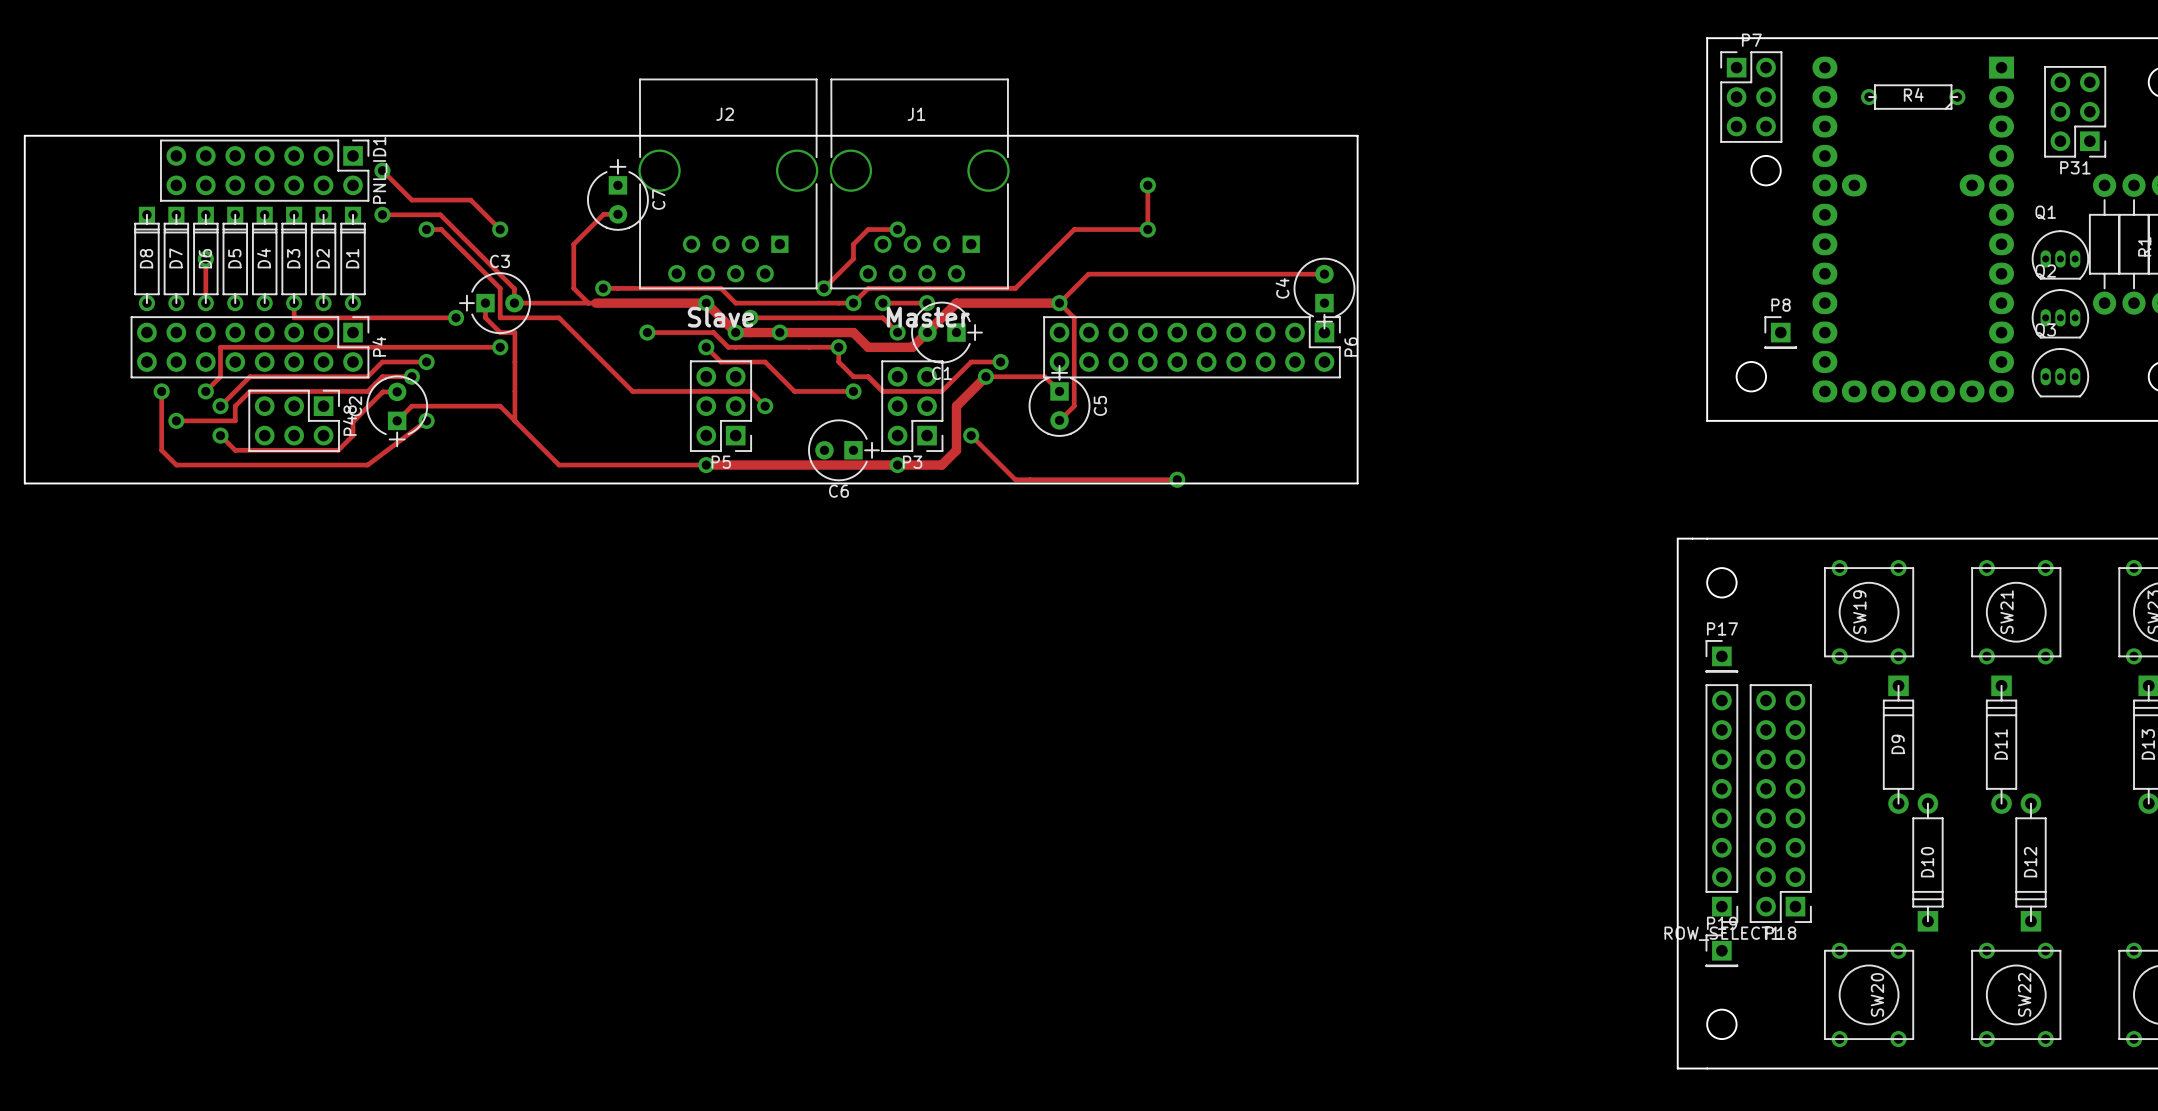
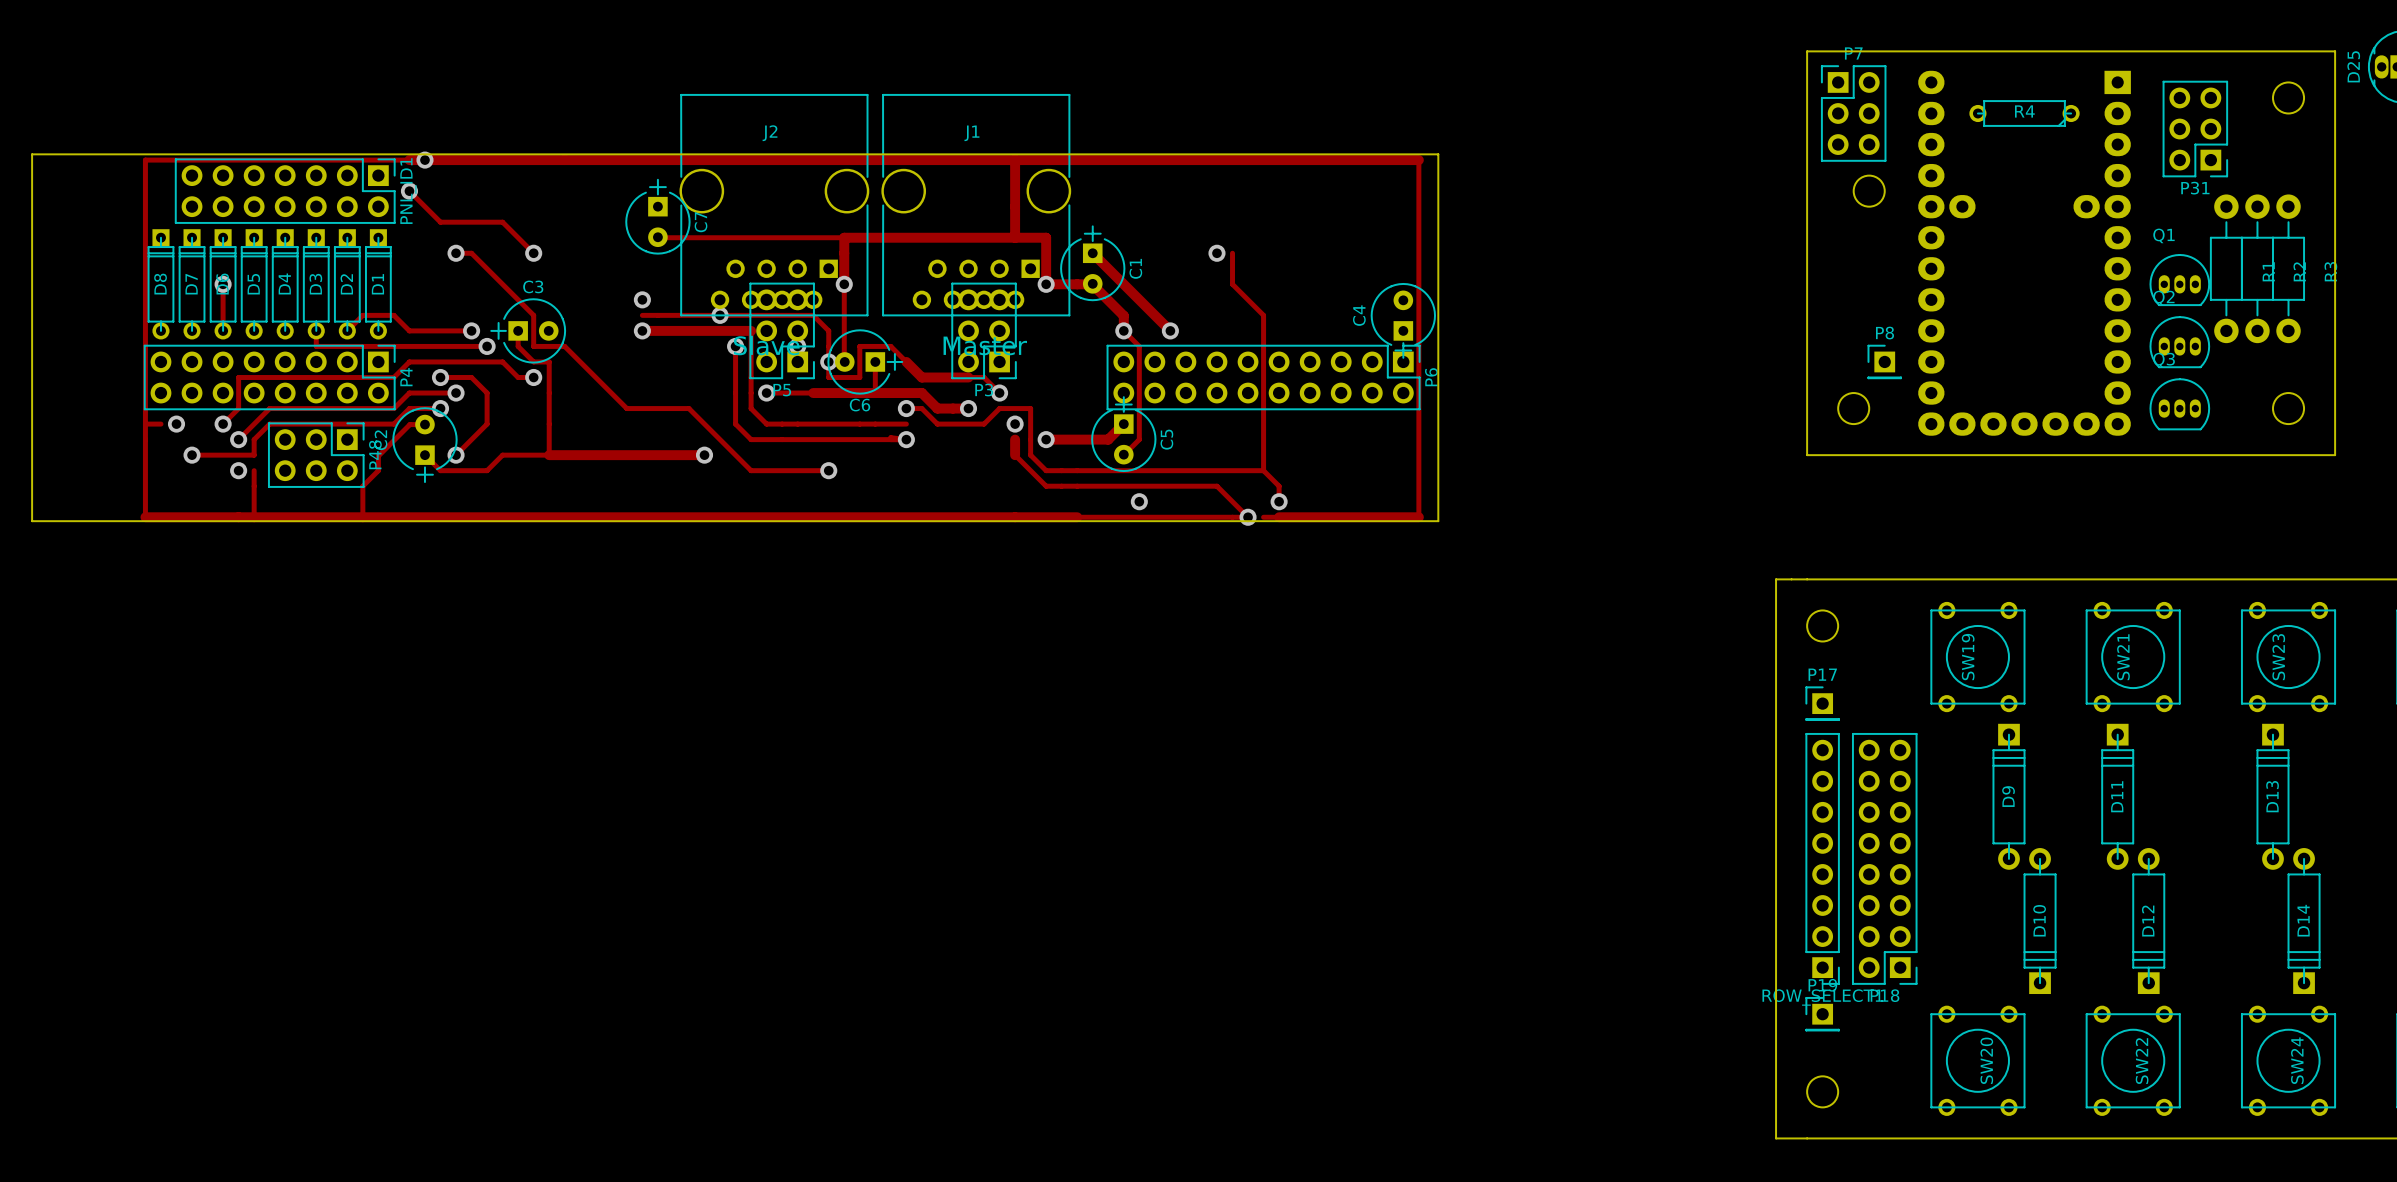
via: none -> (424, 160)
track: none -> (1015, 160) (1015, 237)
track: (1147, 185) (1147, 229) (1074, 229) (1015, 288) (868, 288) (853, 303) (735, 303) (720, 288) -> none
via: (1147, 185) -> none
track: (382, 214) (440, 214) (514, 288) (514, 303) (603, 303) -> none
via: (382, 214) -> none
track: (617, 214) (603, 214) (573, 244) (573, 288) (588, 303) -> (657, 237) (844, 237)
track: none -> (844, 237) (1046, 237) (1046, 284) (1092, 284) (1123, 315) (1123, 330)
track: none -> (844, 237) (844, 361)
track: (897, 229) (868, 229) (853, 244) (853, 258) (824, 288) -> none
via: (897, 229) -> none
track: none -> (1092, 253) (1170, 330)
track: none -> (1232, 253) (1232, 284) (1263, 315) (1263, 470)
via: none -> (844, 284)
via: none -> (1046, 284)
via: none -> (642, 299)
track: (1324, 274) (1088, 274) (1059, 303) (956, 303) (912, 347) -> (999, 393) (984, 377) (968, 377)
via: (603, 288) -> none
via: none -> (720, 315)
via: (824, 288) -> none
track: none -> (347, 330) (362, 315) (393, 315) (409, 330) (471, 330)
via: none -> (471, 330)
via: none -> (642, 330)
track: (706, 303) (735, 332) (853, 332) -> (751, 330) (751, 408) (766, 424)
via: (706, 303) -> none
via: (853, 303) -> none
track: (882, 303) (927, 303) -> none
via: (882, 303) -> none
via: (927, 303) -> none
via: none -> (1170, 330)
track: (529, 317) (559, 317) (632, 391) (720, 391) -> (564, 346) (626, 408) (688, 408) (751, 470) (828, 470)
track: none -> (735, 346) (735, 424) (751, 439) (906, 439) (890, 437) (890, 439)
via: none -> (735, 346)
track: (750, 317) (809, 317) -> (859, 377) (859, 346)
track: (838, 317) (882, 317) (897, 332) -> (890, 346) (906, 361)
track: (647, 332) (713, 332) (728, 347) (779, 347) -> (766, 315) (813, 315) (828, 330) (828, 377)
via: (647, 332) -> none
via: (735, 332) -> none
track: none -> (875, 361) (875, 393)
via: (897, 332) -> none
C1 rotation: 0° (946, 332) -> 90° counterclockwise (1092, 263)
C1 position: (946, 332) -> (1092, 263)
track: (367, 347) (411, 347) -> (393, 377) (409, 361) (502, 361) (518, 377)
via: none -> (440, 377)
track: (441, 347) (485, 347) -> (471, 377) (487, 393) (487, 424) (456, 455)
track: (706, 347) (720, 362) -> none
via: (706, 347) -> none
track: (809, 347) (838, 347) (838, 362) (853, 376) -> none
via: (838, 347) -> none
via: none -> (766, 393)
track: (765, 362) (794, 391) -> (797, 424) (844, 424)
track: none -> (813, 393) (921, 393) (937, 408) (968, 408)
via: none -> (999, 393)
track: (1000, 362) (971, 362) (941, 391) (927, 391) -> (1263, 470) (1046, 470) (1030, 455) (1030, 408) (999, 408) (984, 424)
via: (1000, 362) -> none
via: none -> (906, 408)
via: none -> (968, 408)
via: (985, 376) -> none
track: none -> (145, 424) (160, 424)
track: (161, 391) (161, 450) (176, 465) (367, 465) (426, 420) -> none
track: (750, 391) (765, 406) -> (1015, 455) (1030, 470)
via: (853, 391) -> none
via: none -> (1015, 424)
track: (1059, 391) (1044, 376) (985, 376) (956, 406) -> (1123, 424) (1108, 439) (1046, 439)
P5 position: (720, 406) -> (782, 330)
via: (765, 406) -> none
via: none -> (906, 439)
P3 position: (912, 406) -> (984, 330)
via: none -> (1046, 439)
track: (397, 420) (411, 406) (500, 406) (559, 465) (941, 465) (956, 450) (956, 420) -> (424, 455) (440, 470) (487, 470) (502, 455) (704, 455)
via: none -> (704, 455)
track: (220, 435) (235, 450) (338, 450) -> (362, 517) (362, 486)
track: none -> (254, 470) (254, 517)
via: none -> (828, 470)
via: (971, 435) -> none
track: none -> (1263, 470) (1279, 486) (1279, 501)
C6 position: (843, 450) -> (865, 361)
track: (985, 450) (1015, 479) -> (1046, 486) (1216, 486) (1248, 517)
via: (706, 465) -> none
via: (897, 465) -> none
via: none -> (1139, 501)
via: none -> (1279, 501)
track: none -> (1077, 517) (145, 517) (145, 160) (1418, 160) (1418, 517) (1263, 517)

